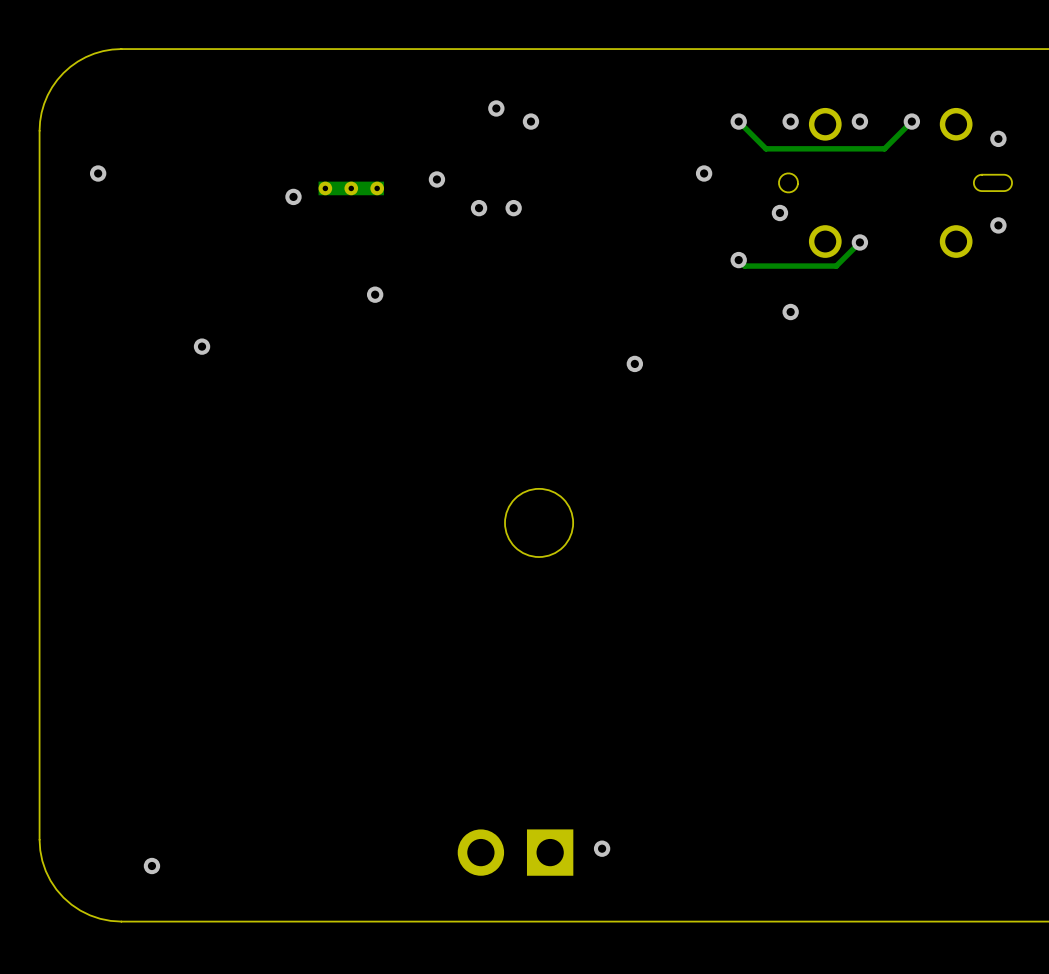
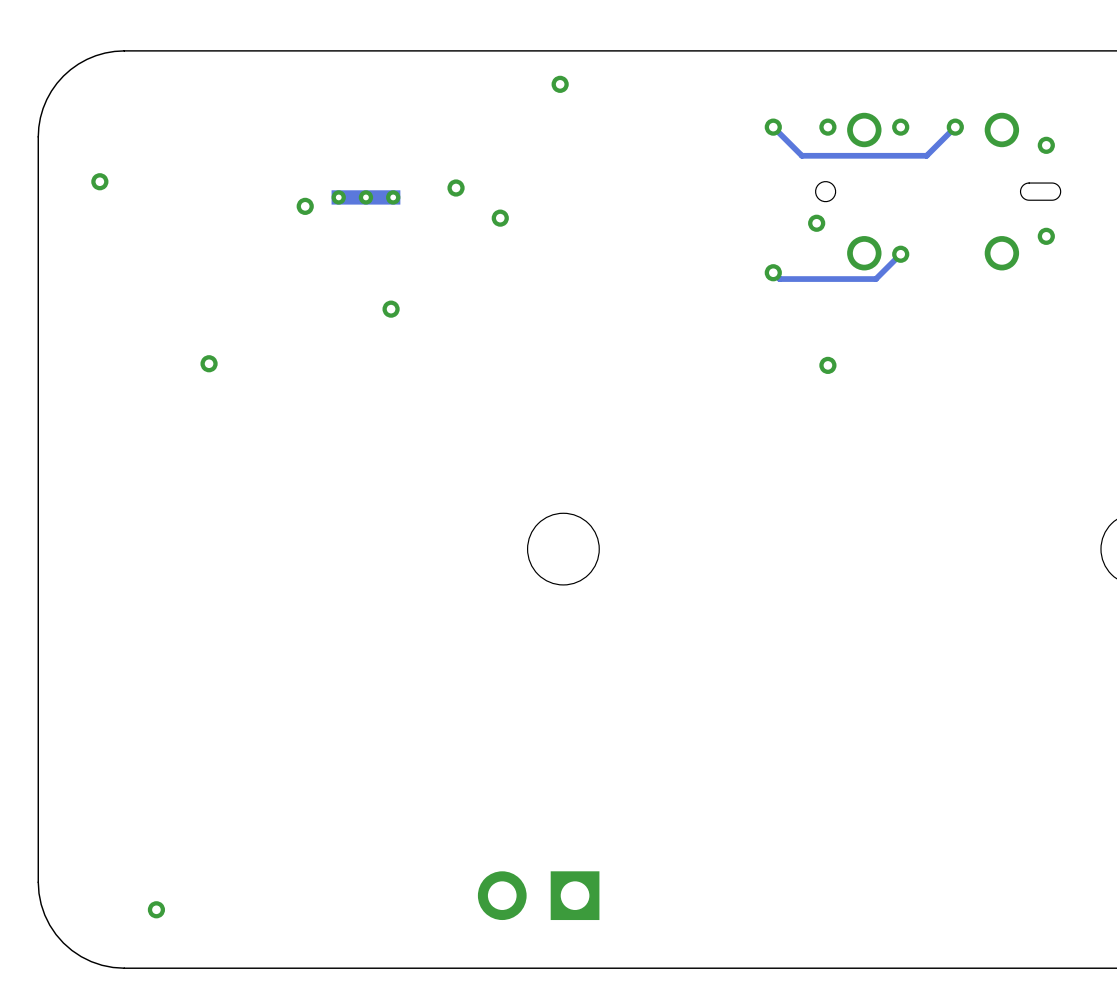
via: none -> (560, 84)
via: (496, 108) -> none
via: (530, 121) -> none
via: (704, 173) -> none
via: (513, 208) -> none
via position: (790, 312) -> (827, 365)
via: (634, 363) -> none
via: (602, 848) -> none

